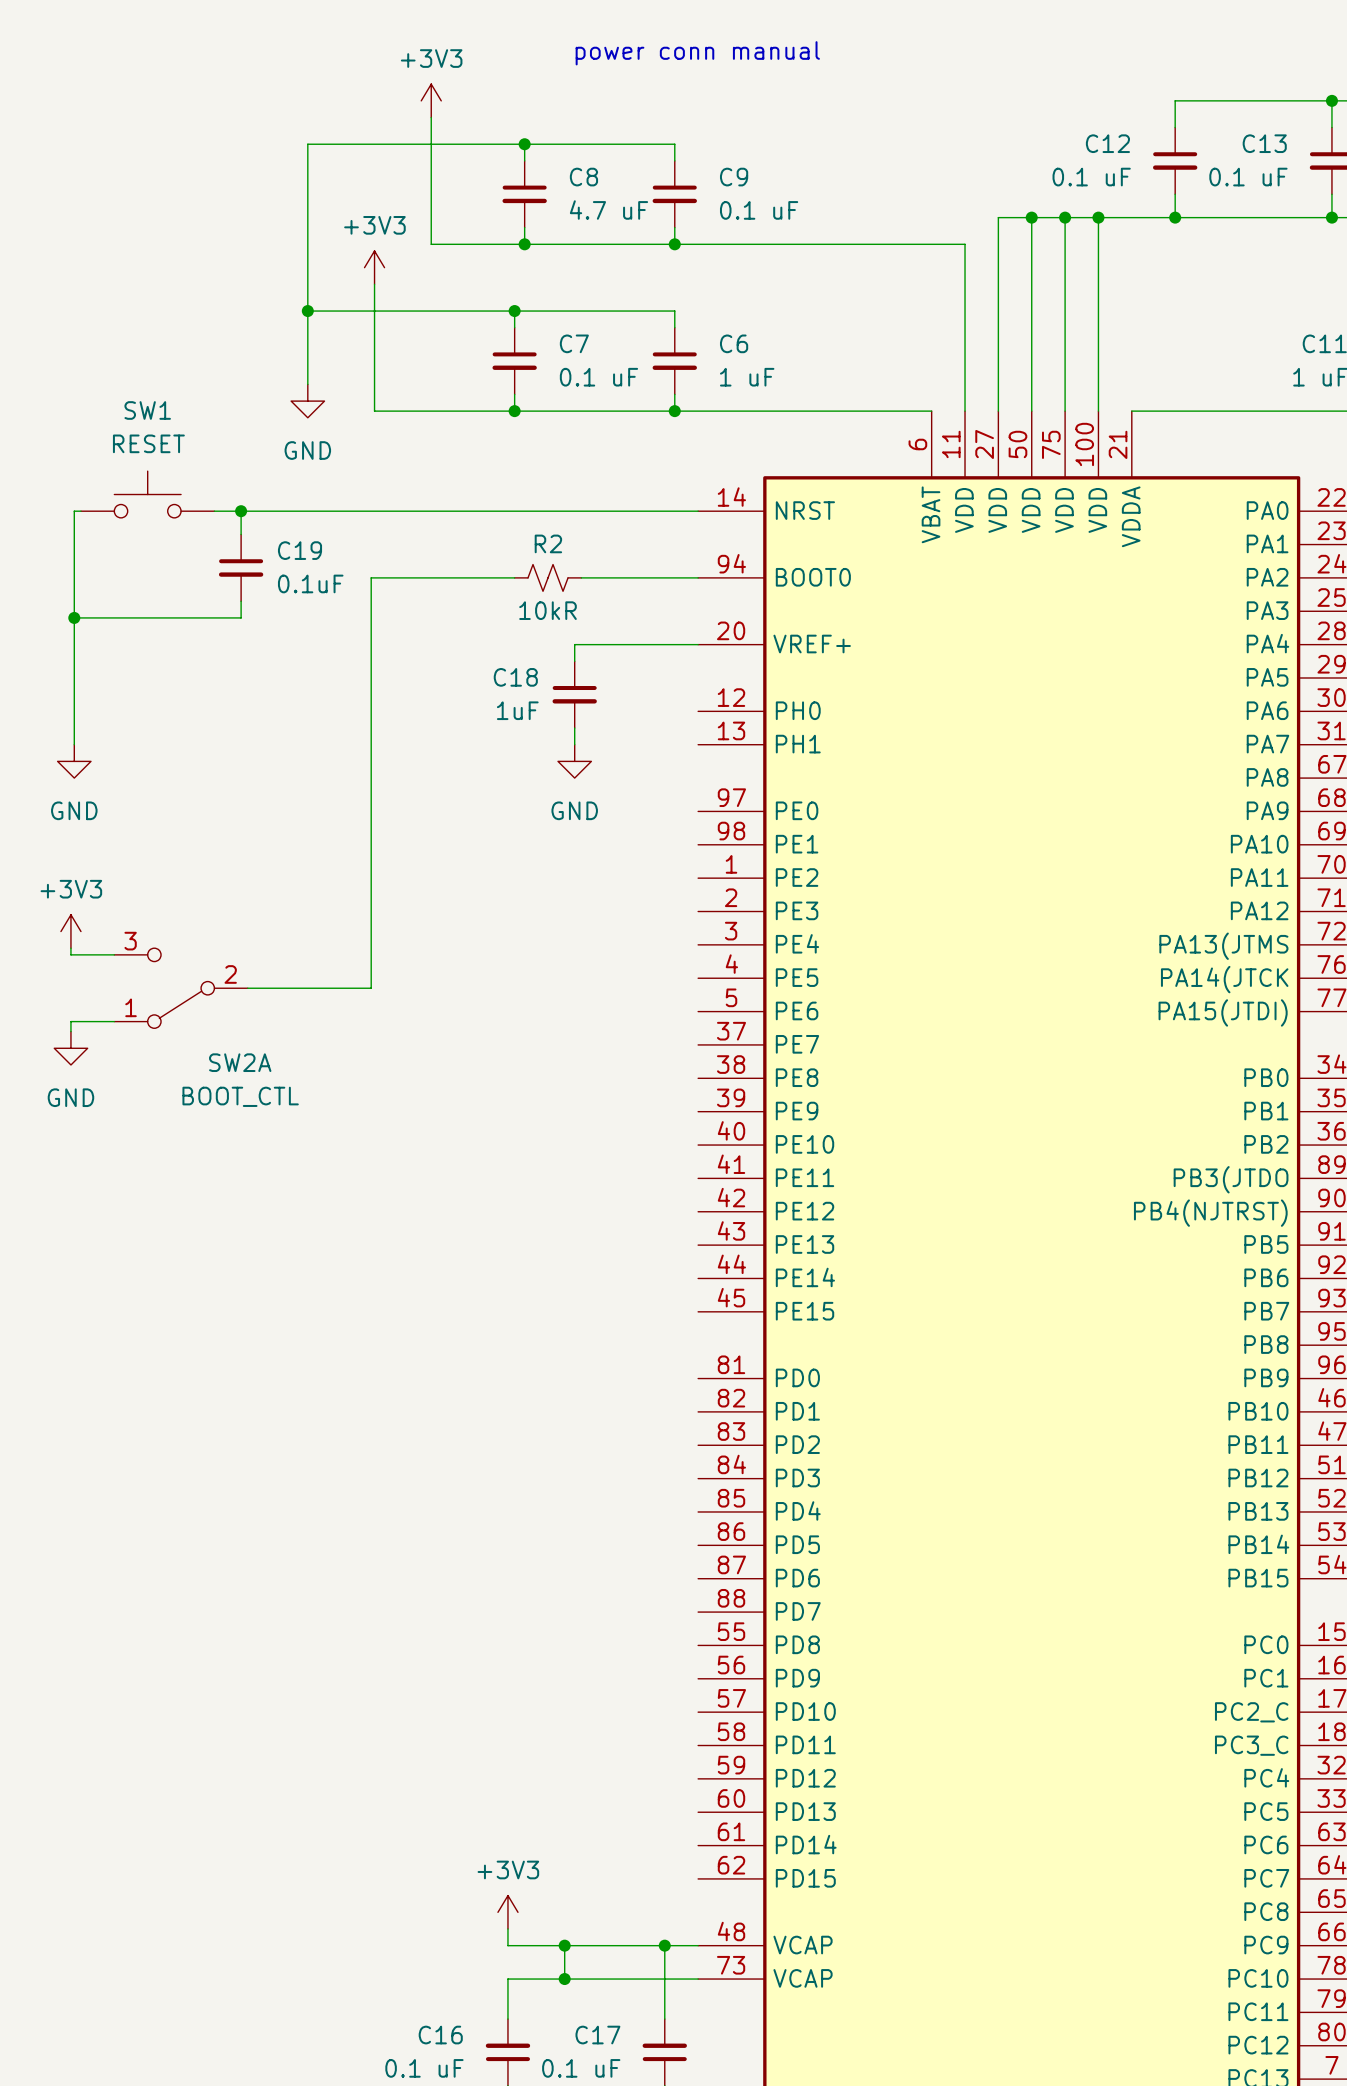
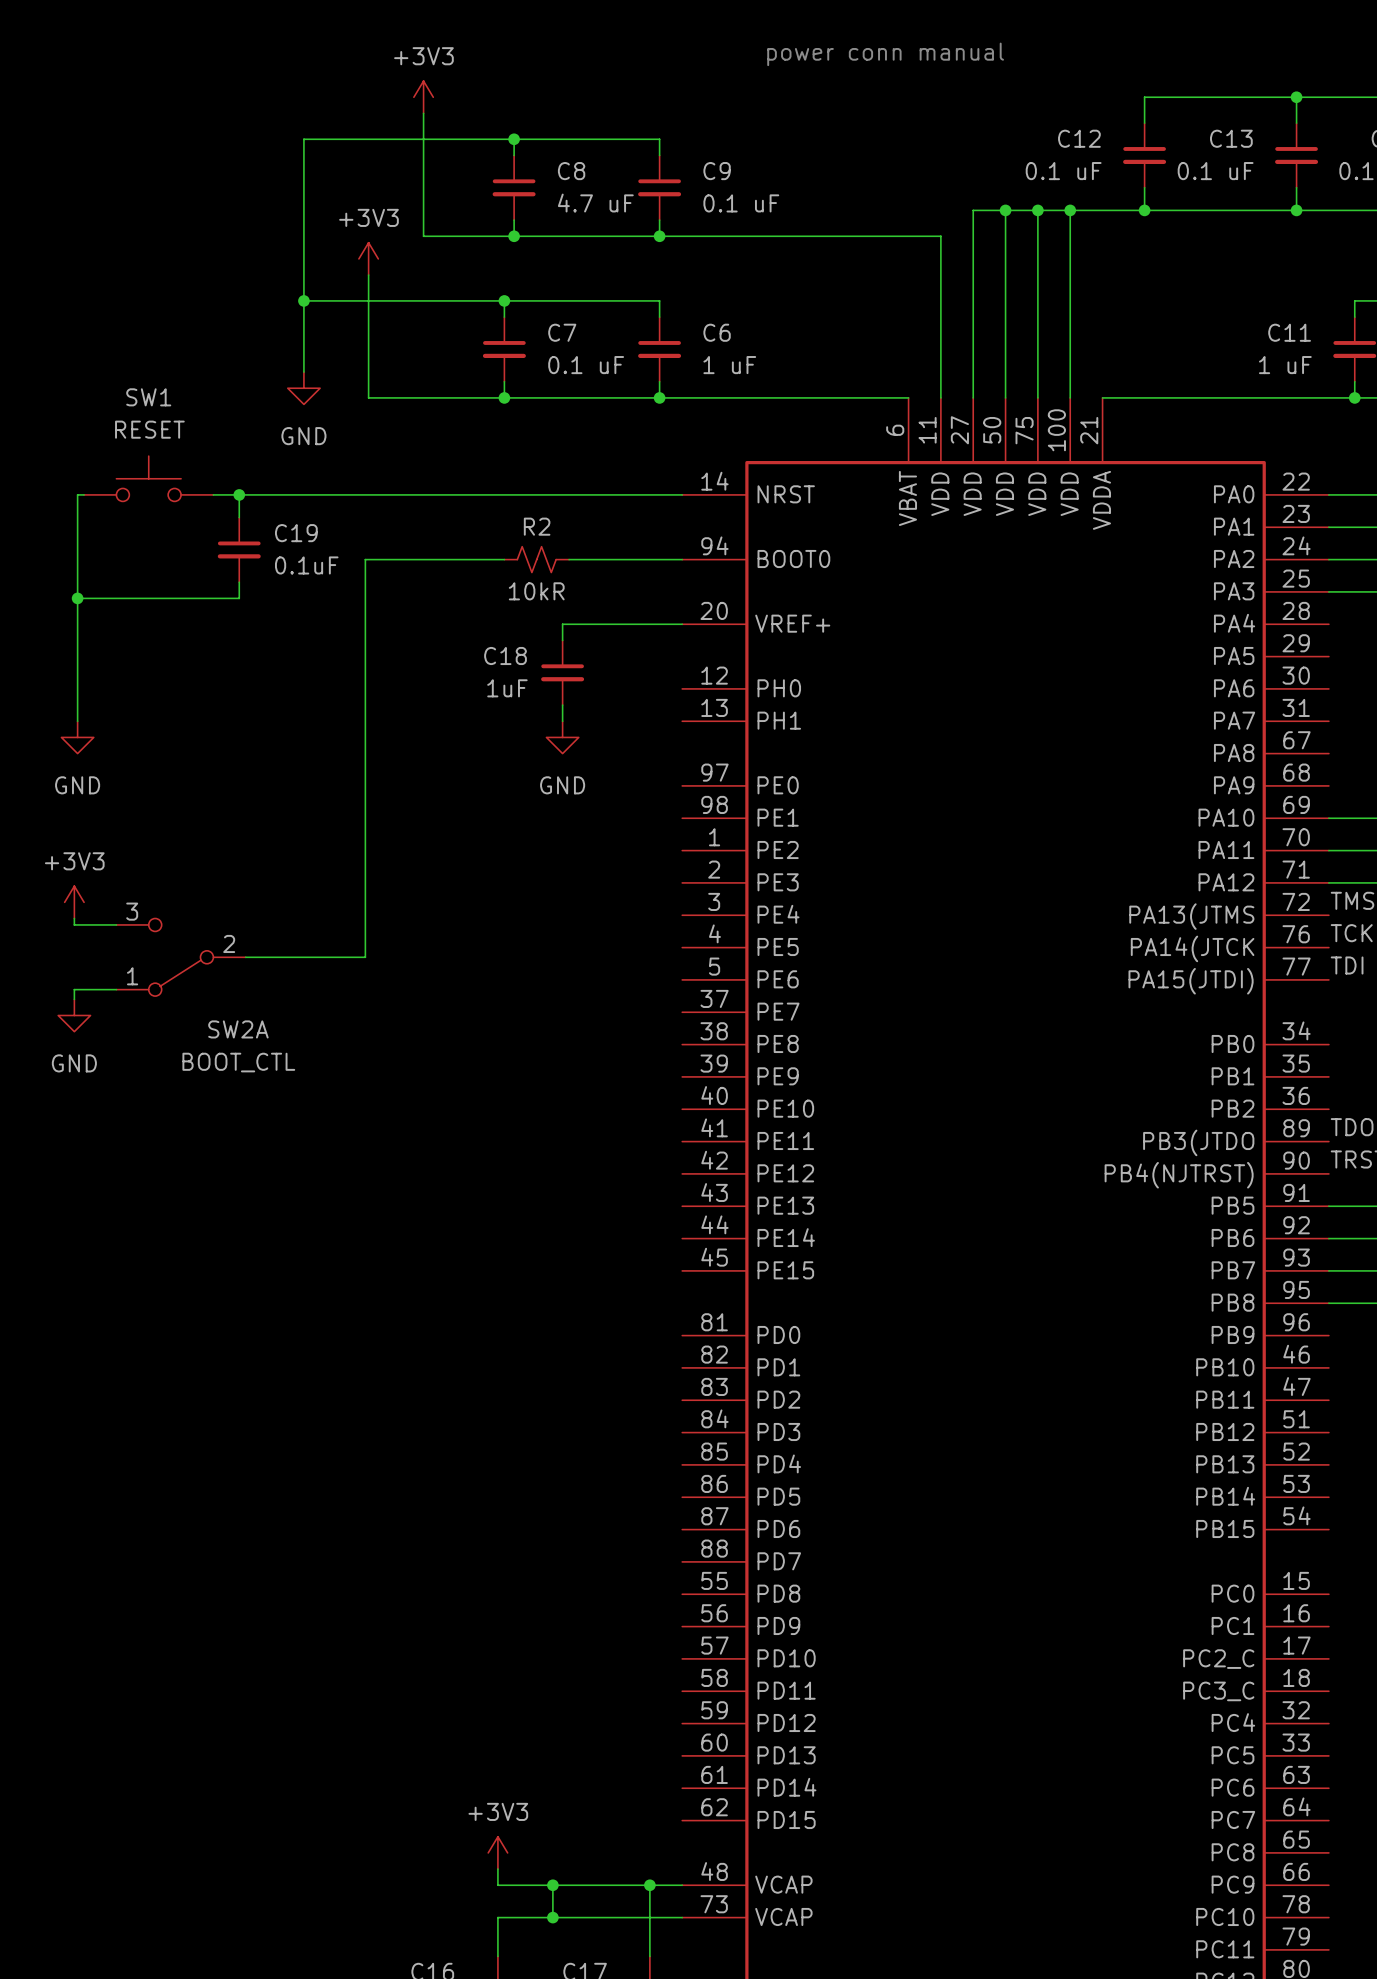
text position: power conn manual (697, 53) -> power conn manual (885, 54)

